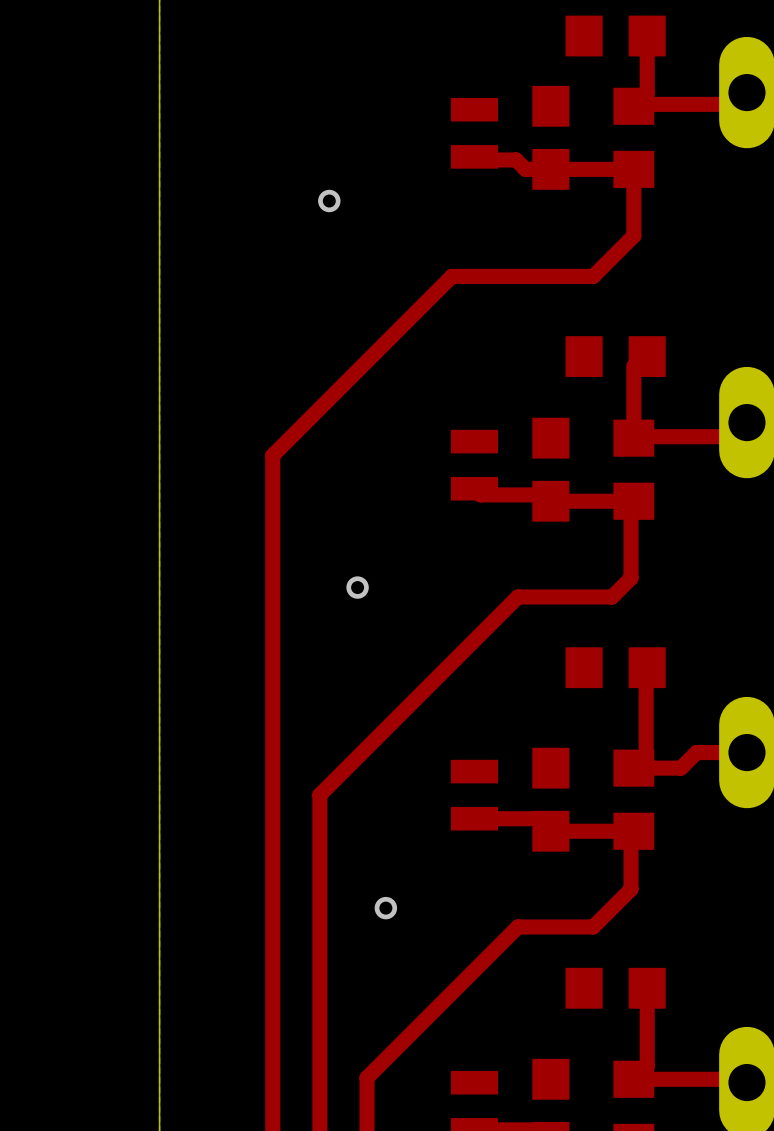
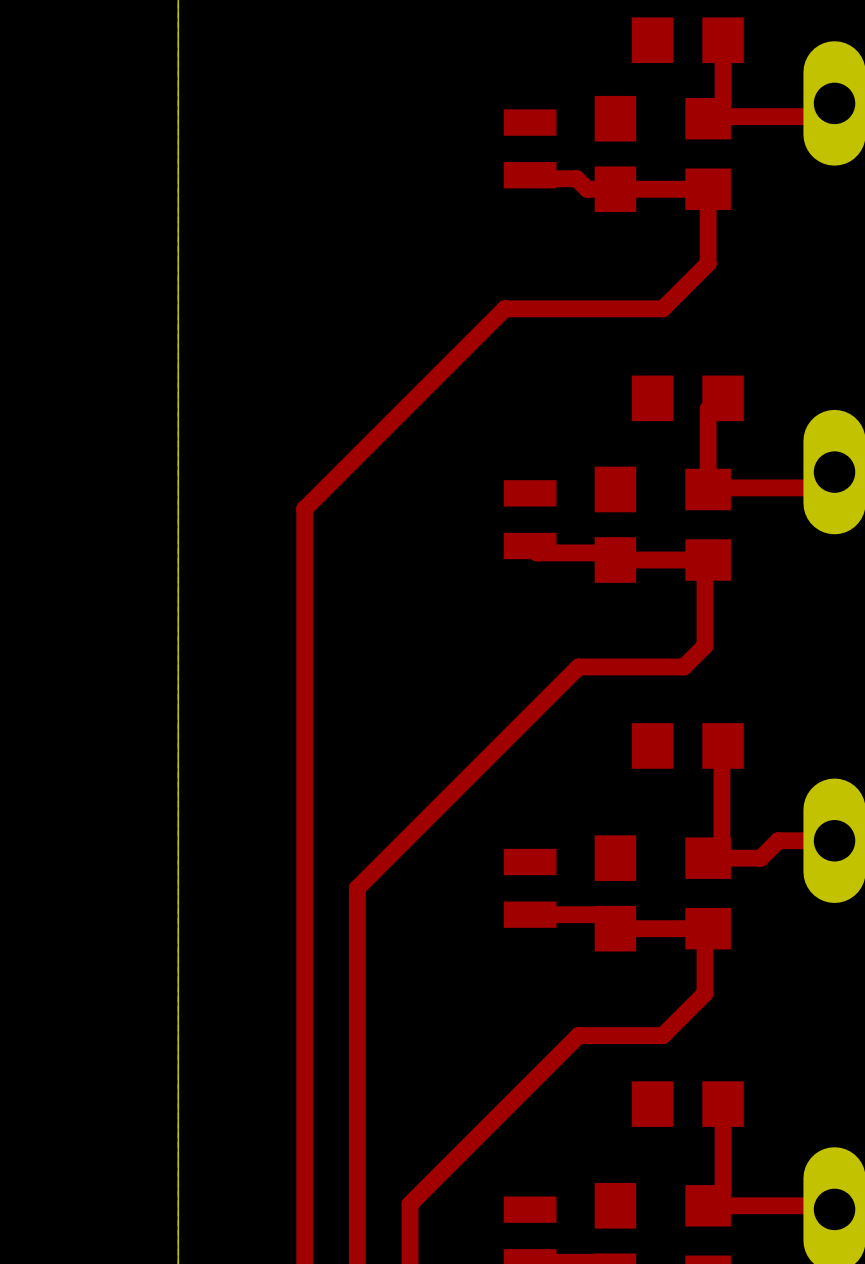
via: (329, 201) -> none
via: (357, 587) -> none
via: (385, 908) -> none

